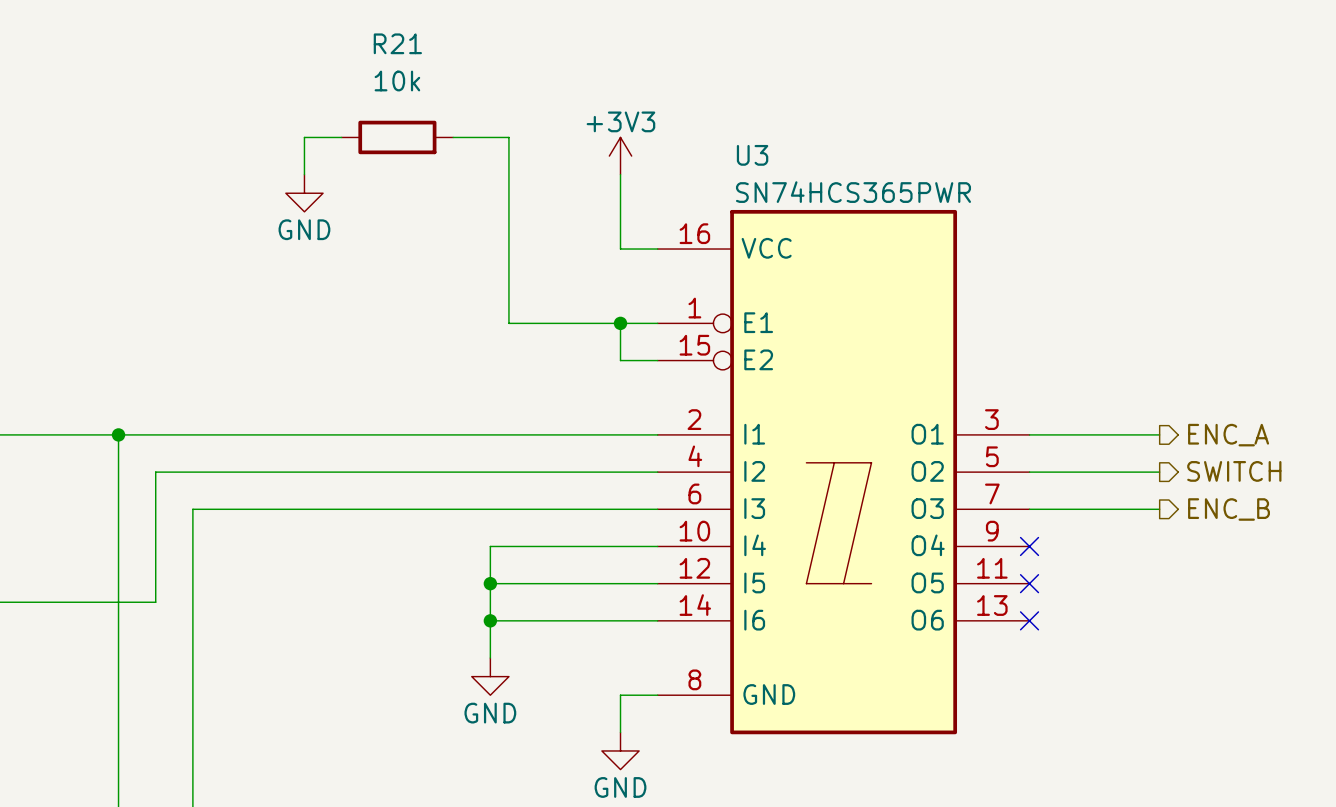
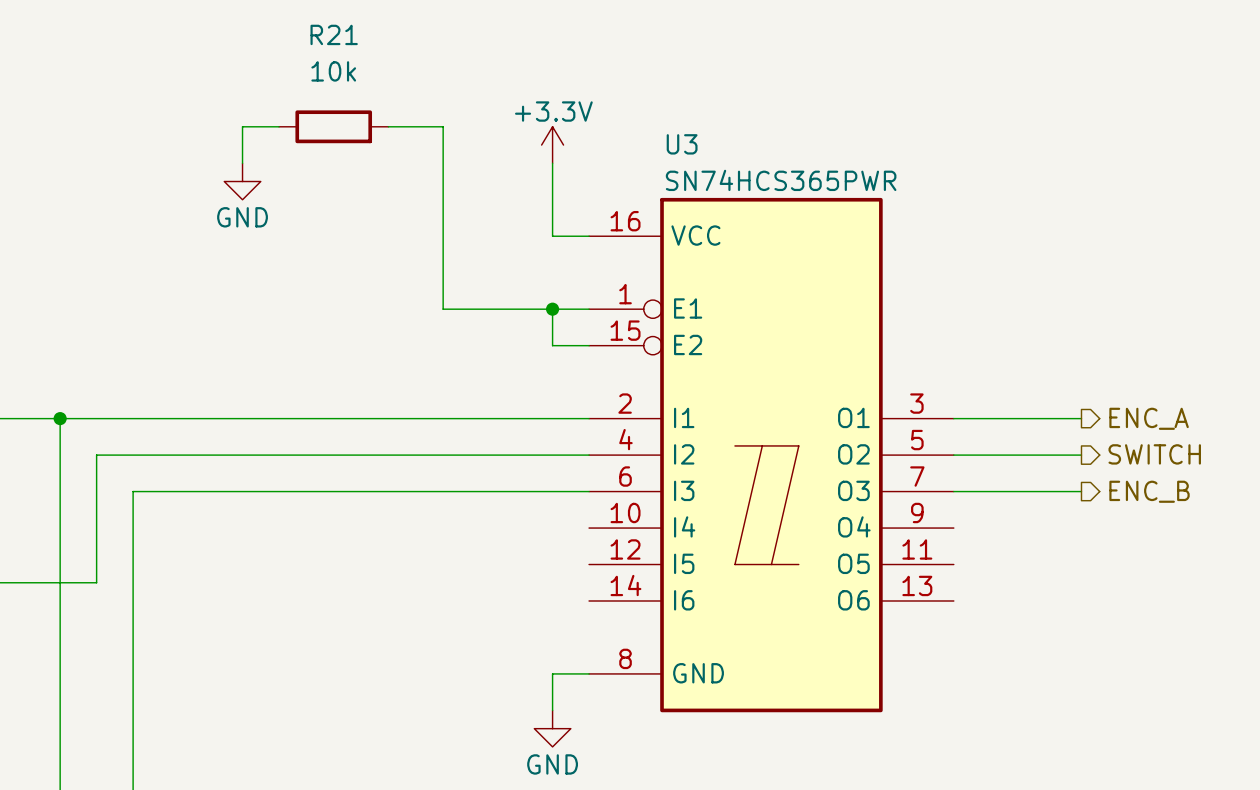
power symbol: +3V3 (620, 156) -> +3.3V (552, 145)
wire: (657, 546) (490, 546) (490, 658) -> none
no-connect mark: (1029, 546) -> none
wire: (490, 583) (657, 583) -> none
junction: (490, 583) -> none
no-connect mark: (1029, 583) -> none
wire: (490, 620) (657, 620) -> none
junction: (490, 620) -> none
no-connect mark: (1029, 620) -> none
power symbol: GND (490, 676) -> none

